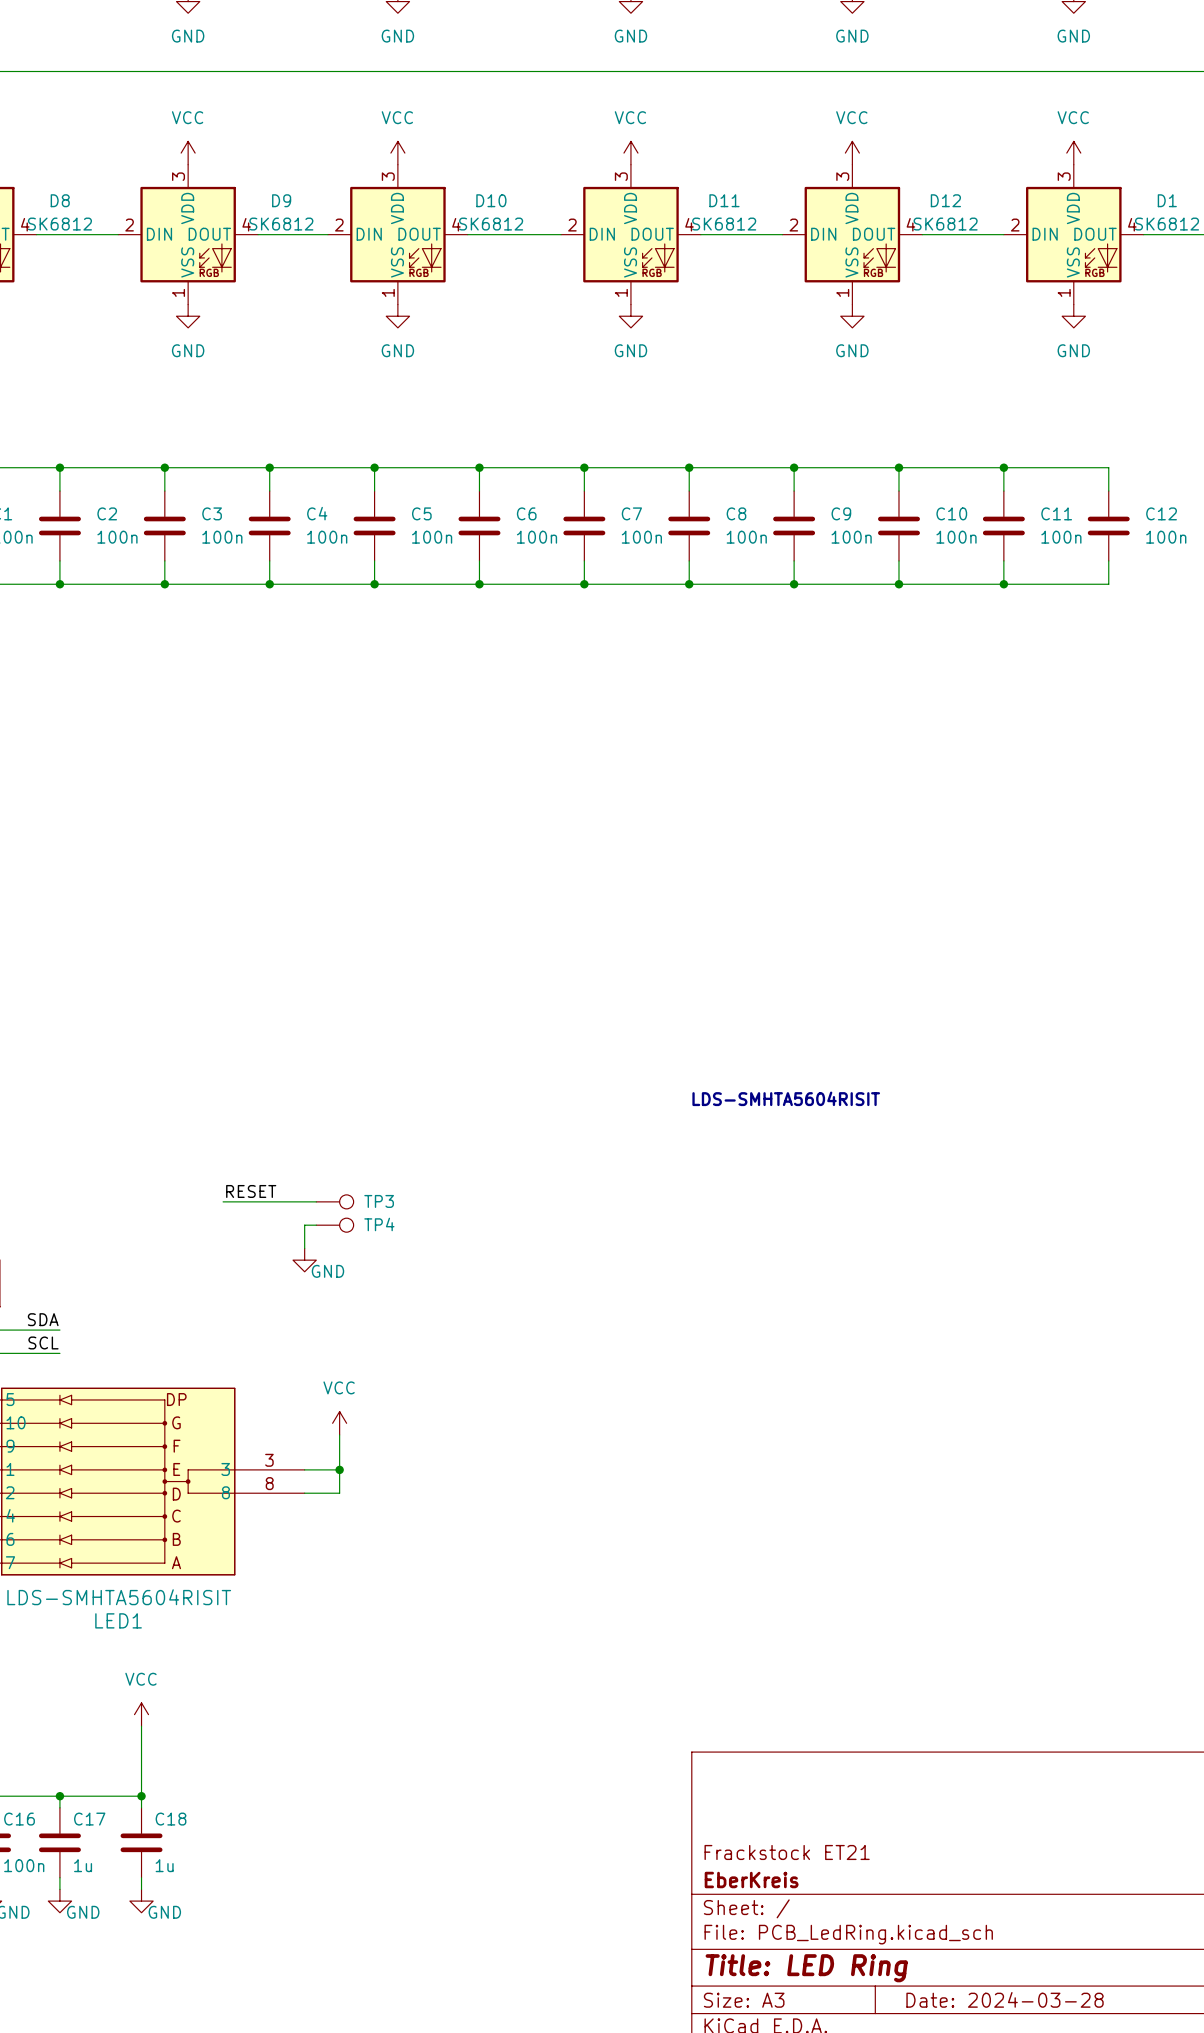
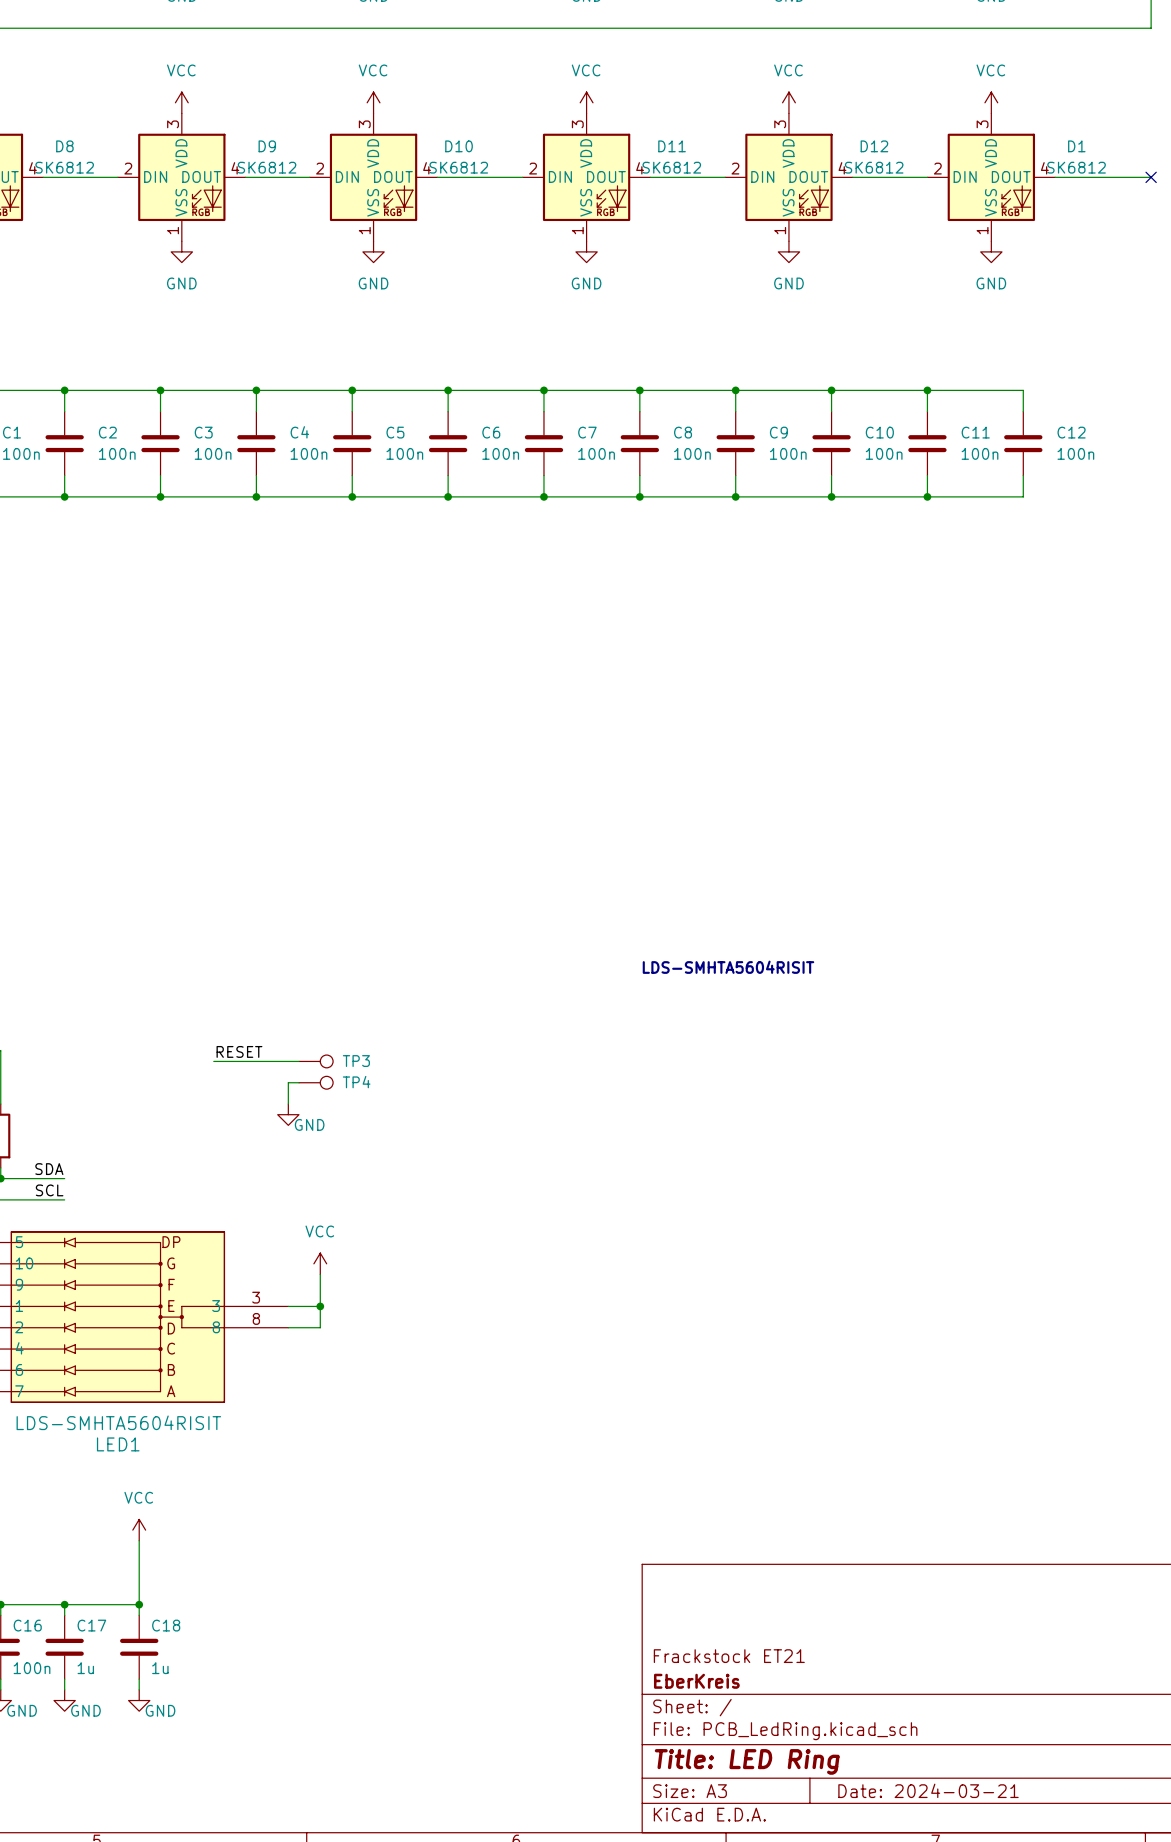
title block: Date: 2024-03-28 (1005, 1999) -> Date: 2024-03-21 (928, 1790)

